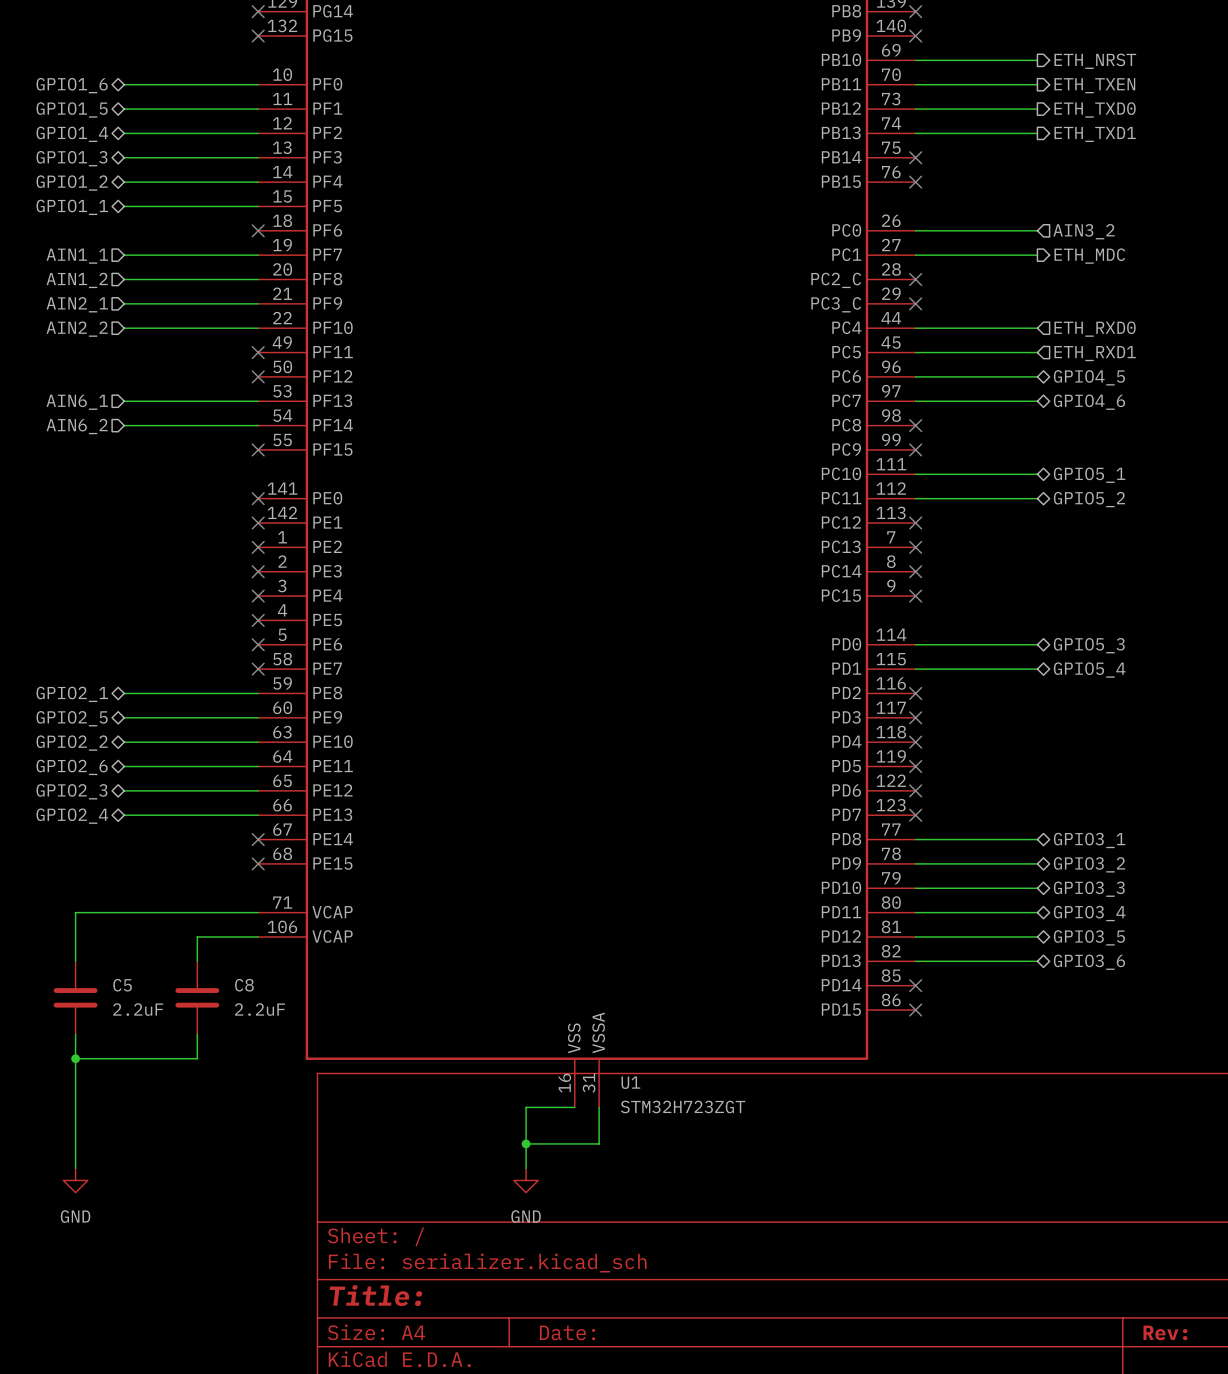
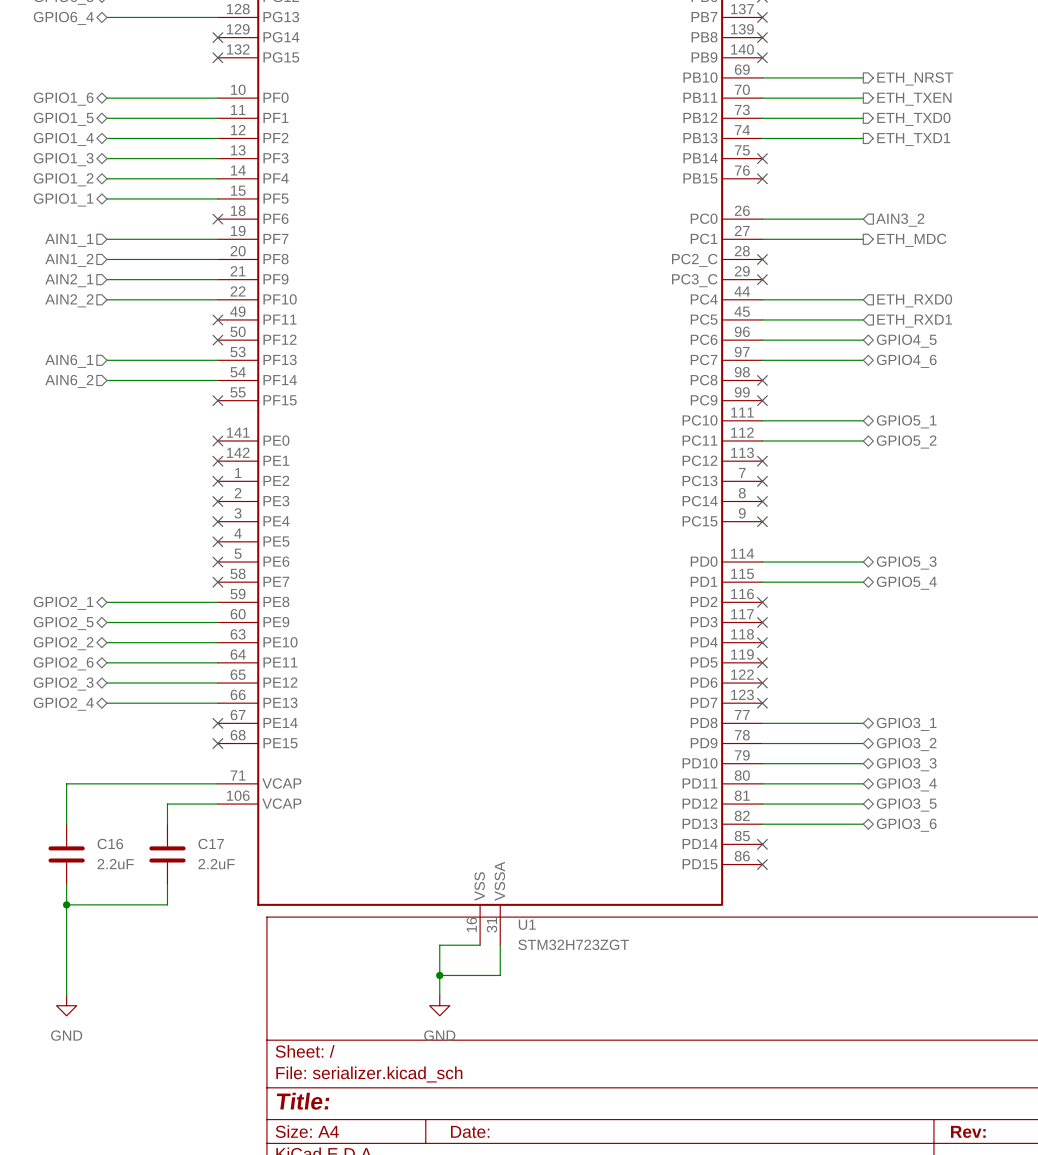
C5 name: C5 (122, 985) -> C16 (110, 843)
C8 name: C8 (244, 985) -> C17 (211, 843)

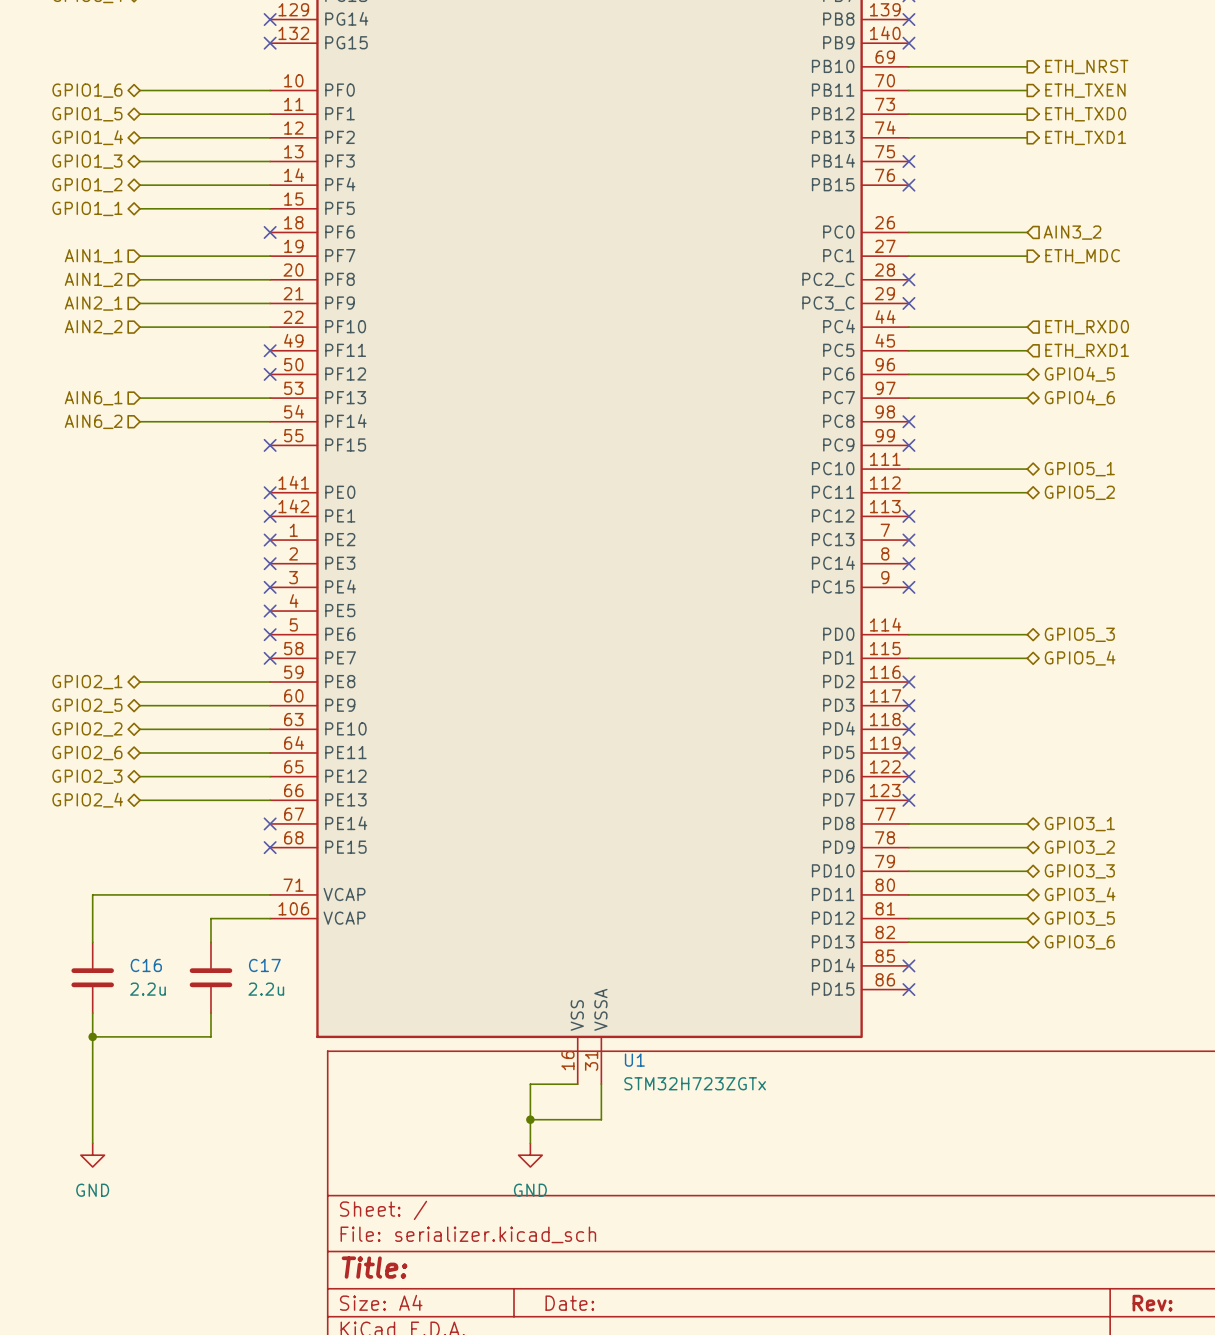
C16 value: 2.2uF (115, 864) -> 2.2u (147, 989)
C17 value: 2.2uF (216, 864) -> 2.2u (266, 989)
U1 value: STM32H723ZGT (573, 944) -> STM32H723ZGTx (695, 1083)

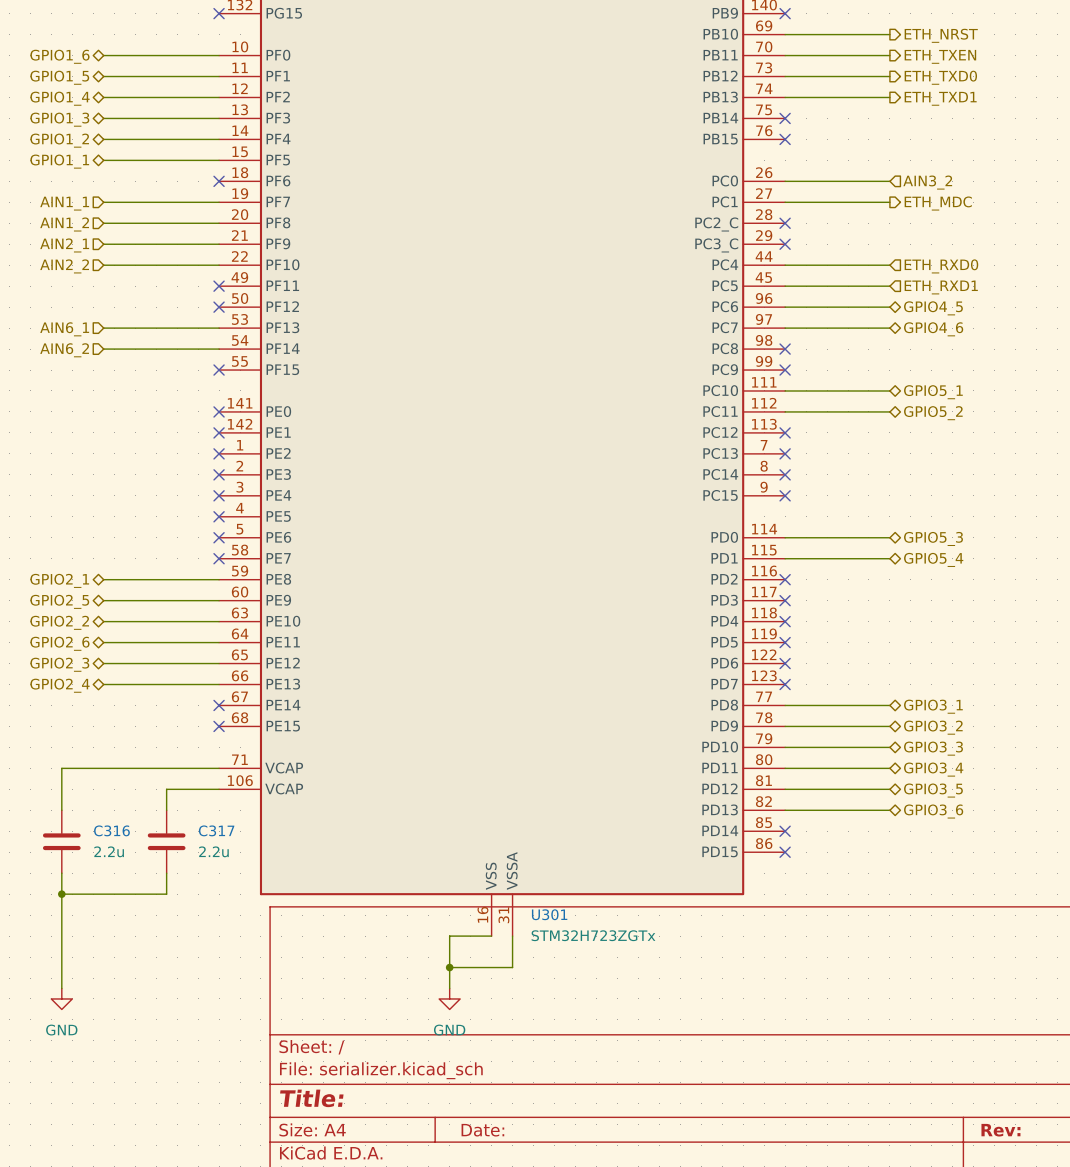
C16 name: C16 (146, 965) -> C316 (111, 830)
C17 name: C17 (264, 965) -> C317 (216, 830)
U1 name: U1 (634, 1060) -> U301 (549, 914)

